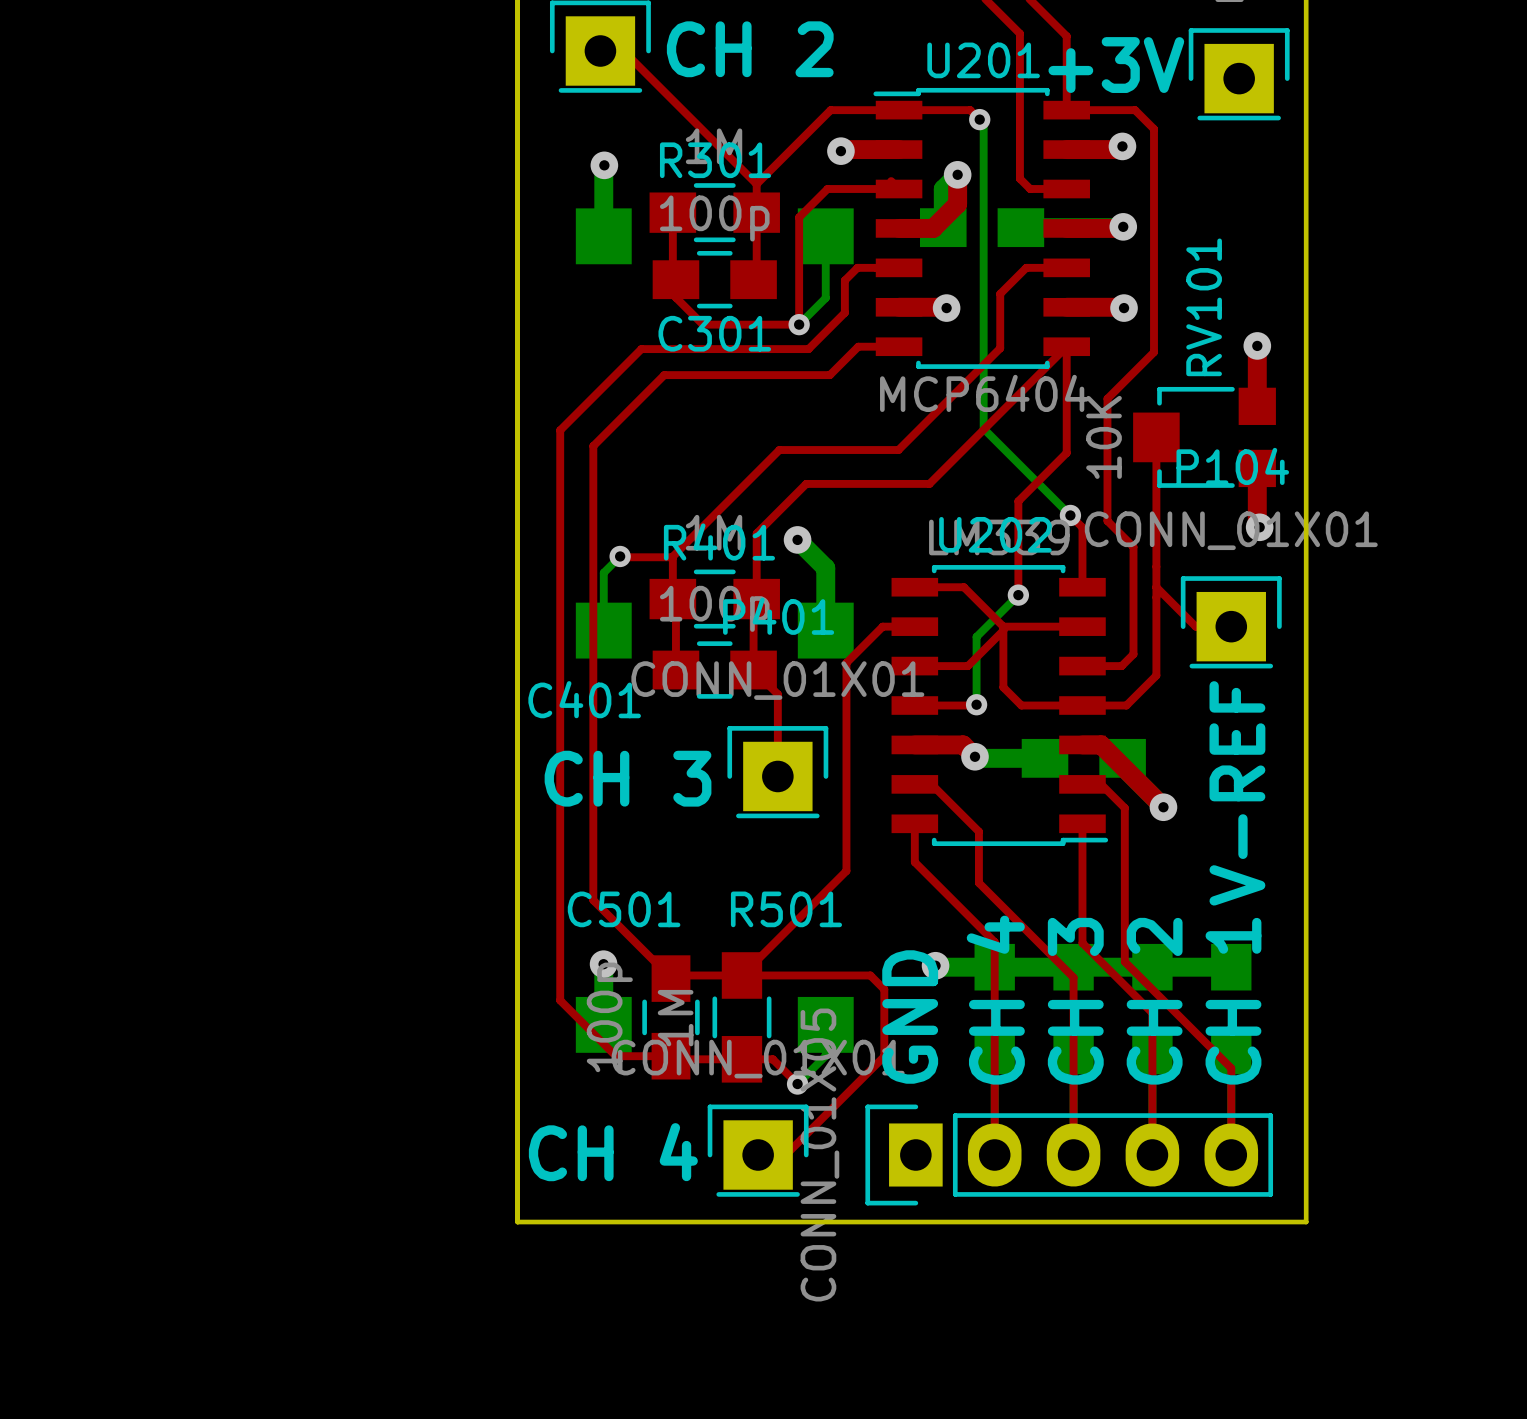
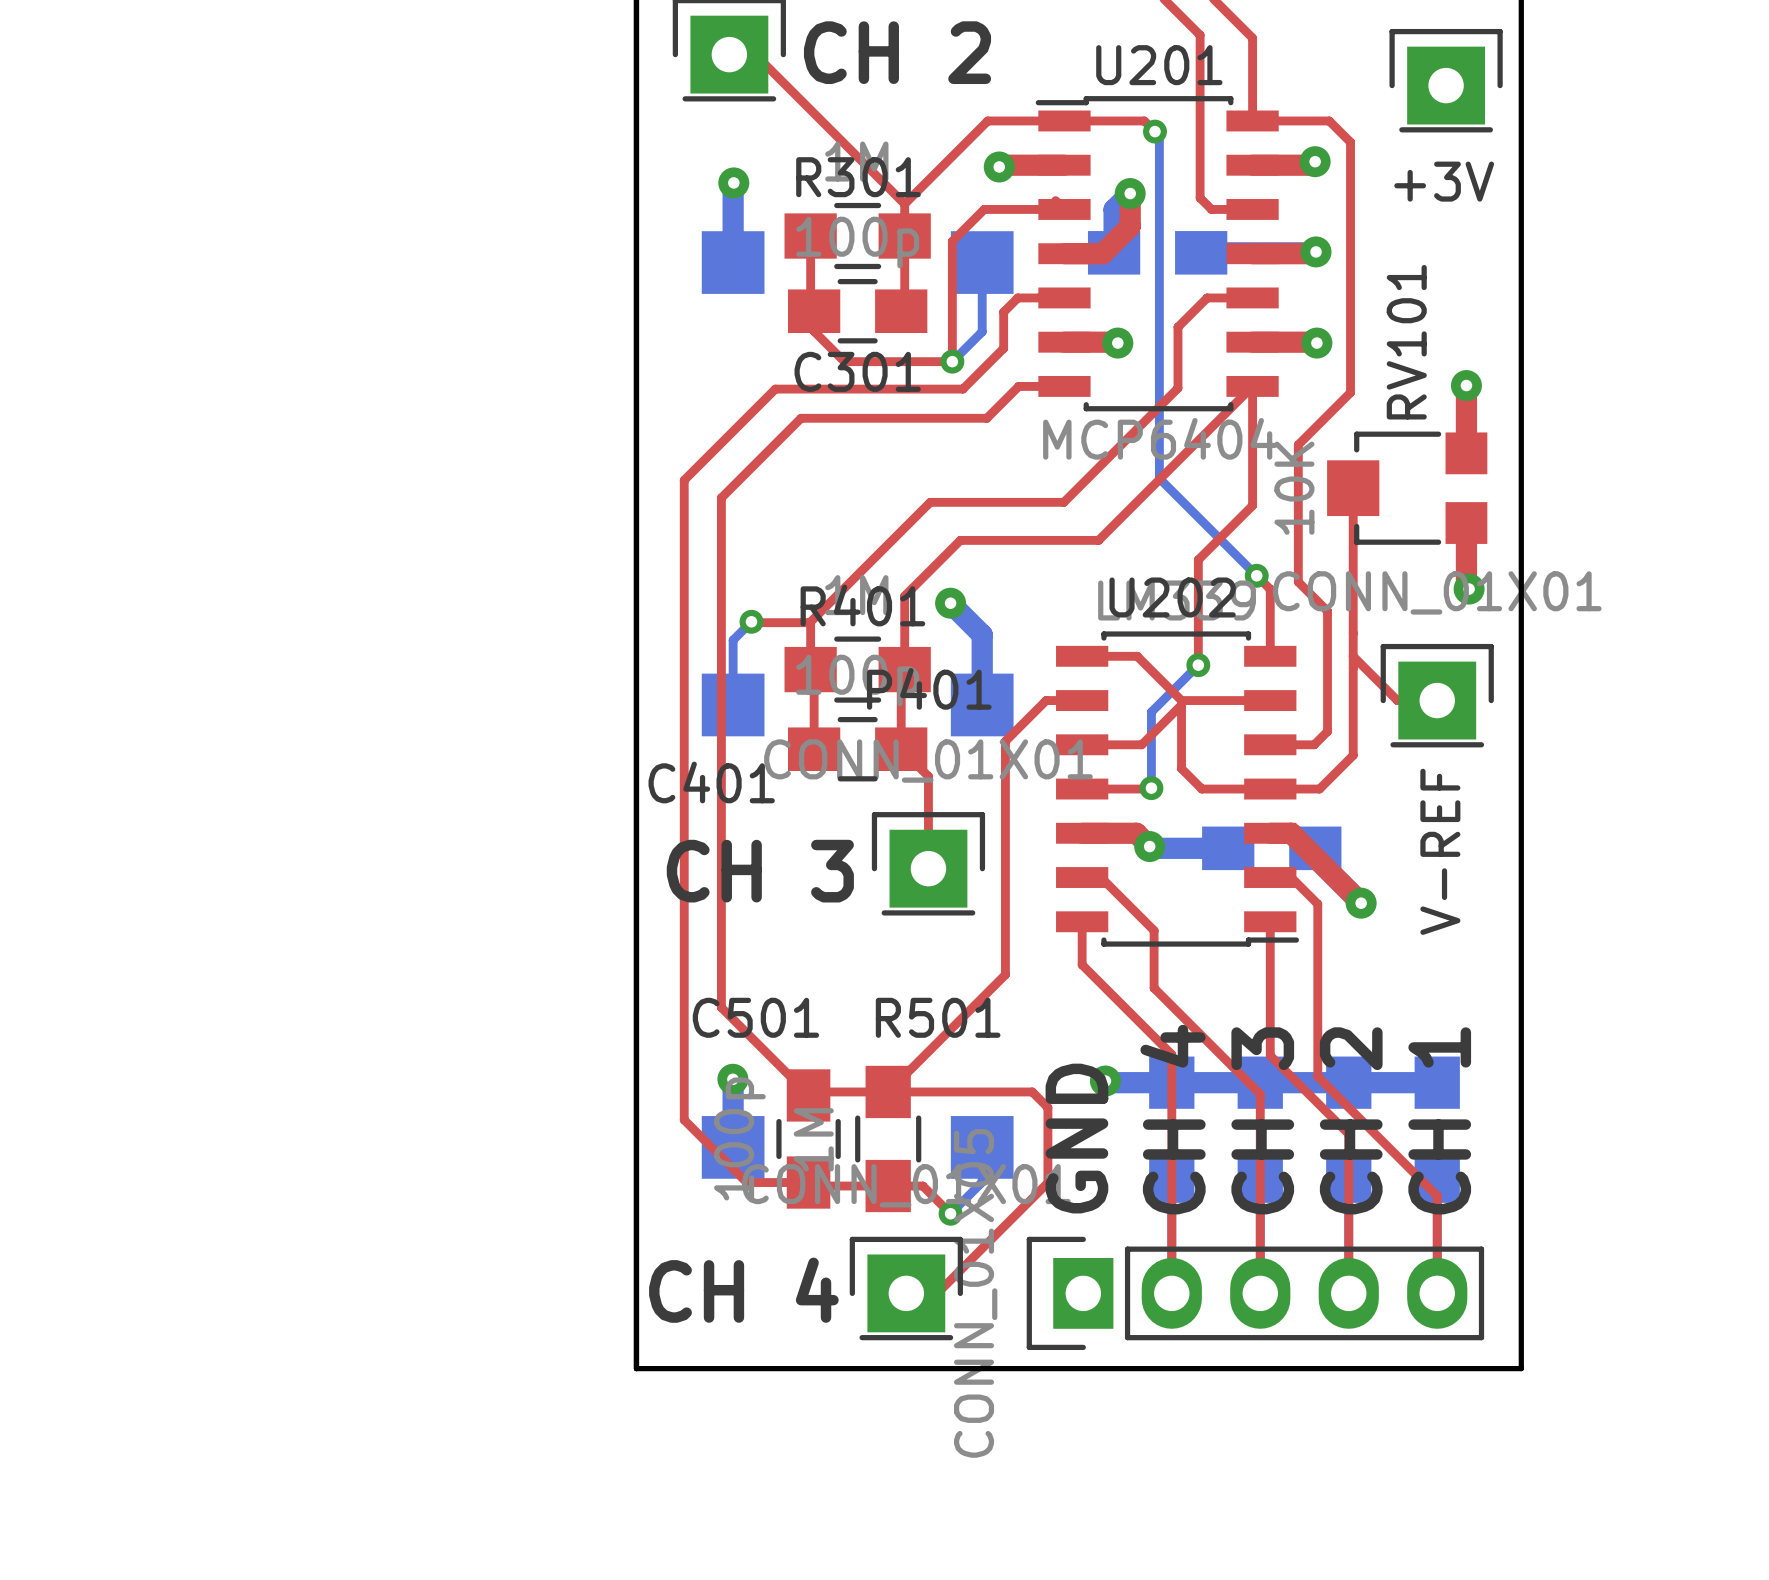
text: +3V (1116, 65) -> none
+3V name: none -> +3V (1444, 181)
P104 name: P104 (1232, 466) -> V-REF (1440, 851)
text: V-REF (1237, 793) -> none

